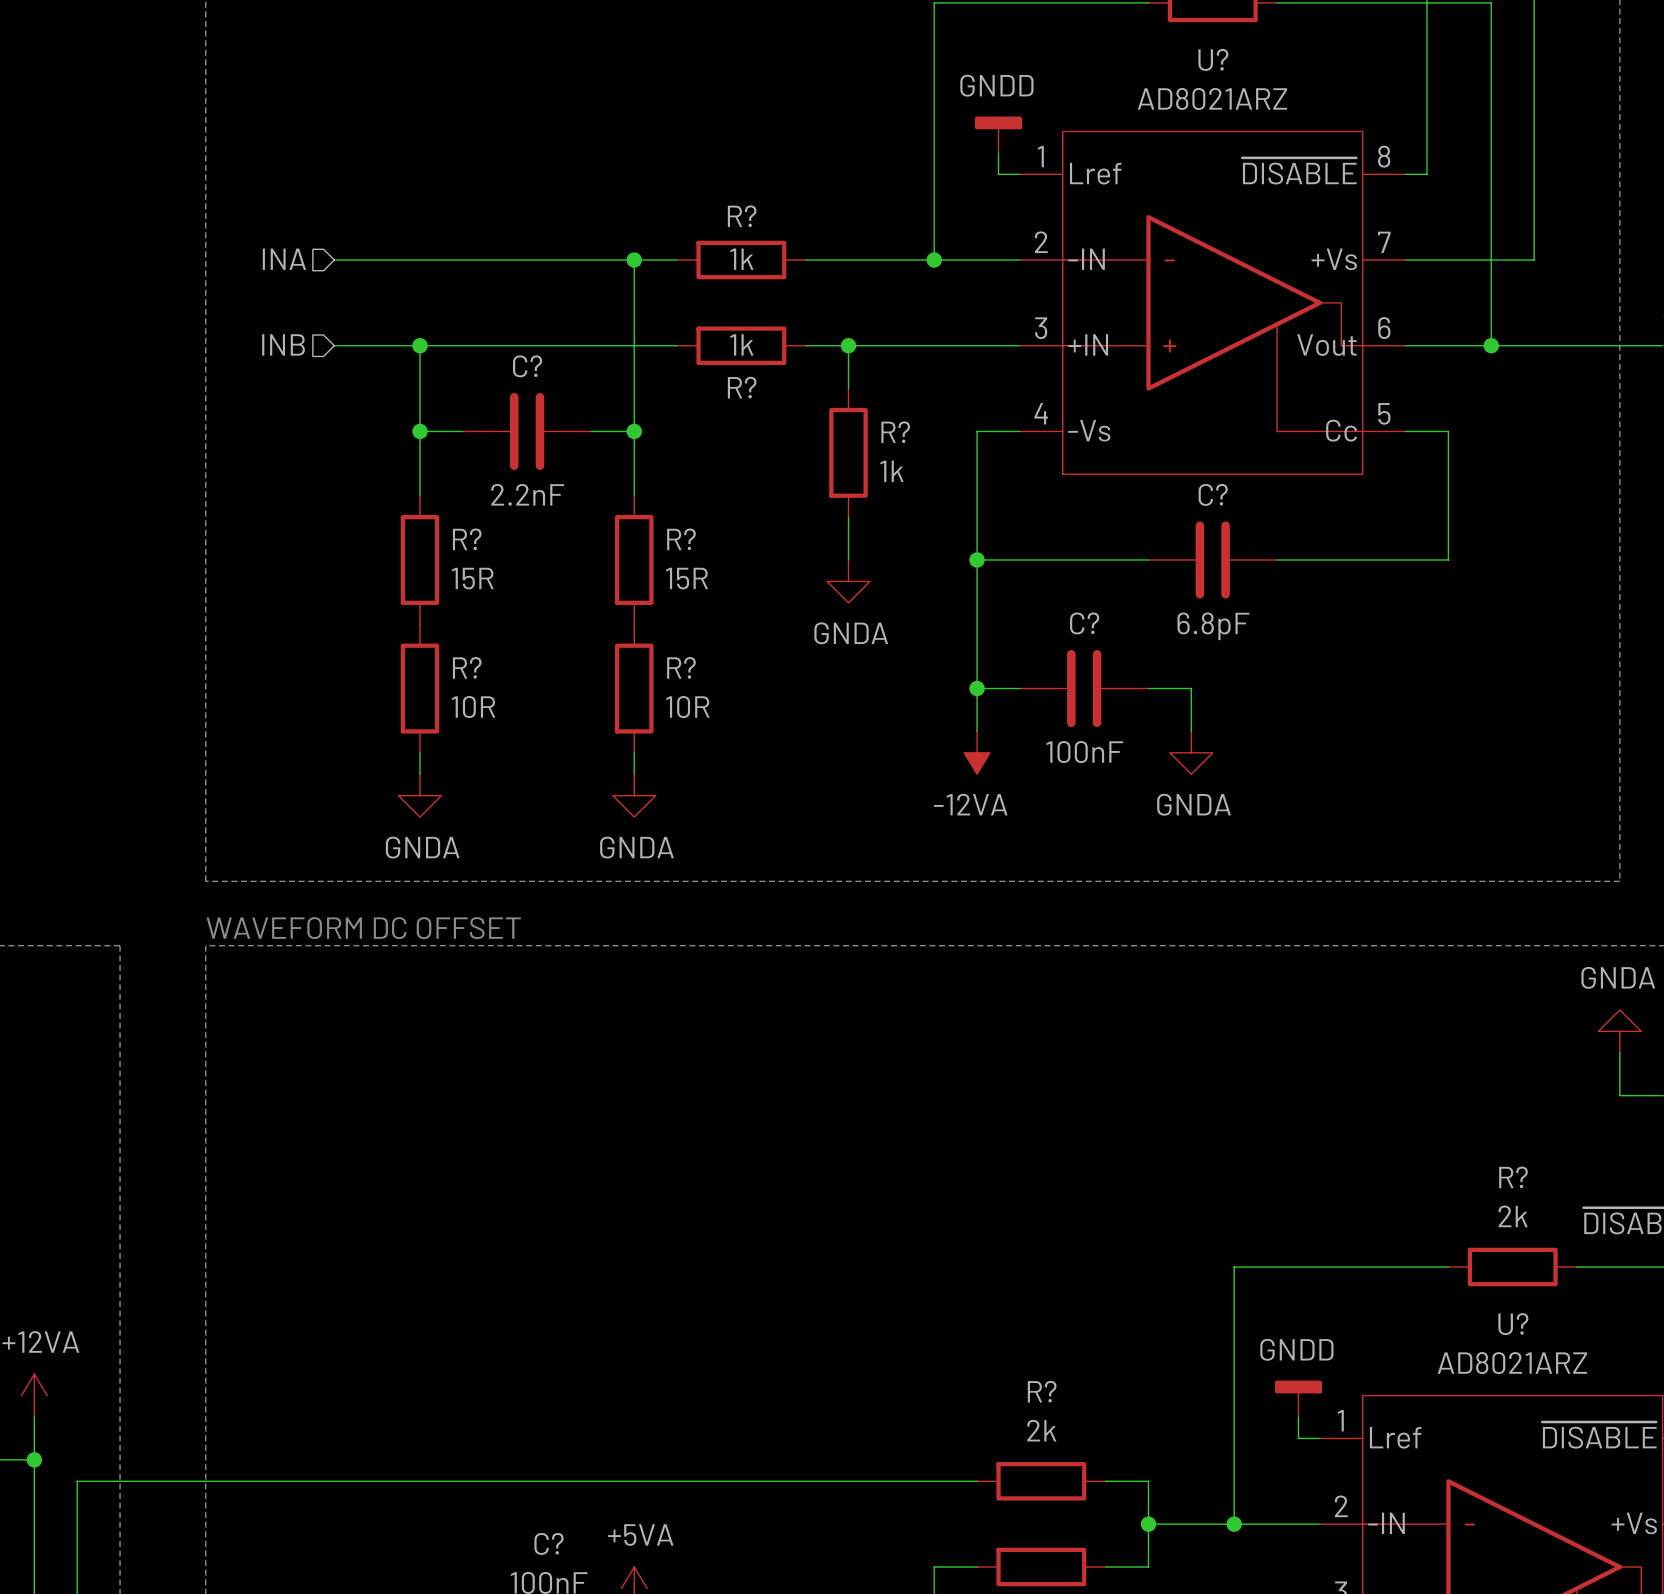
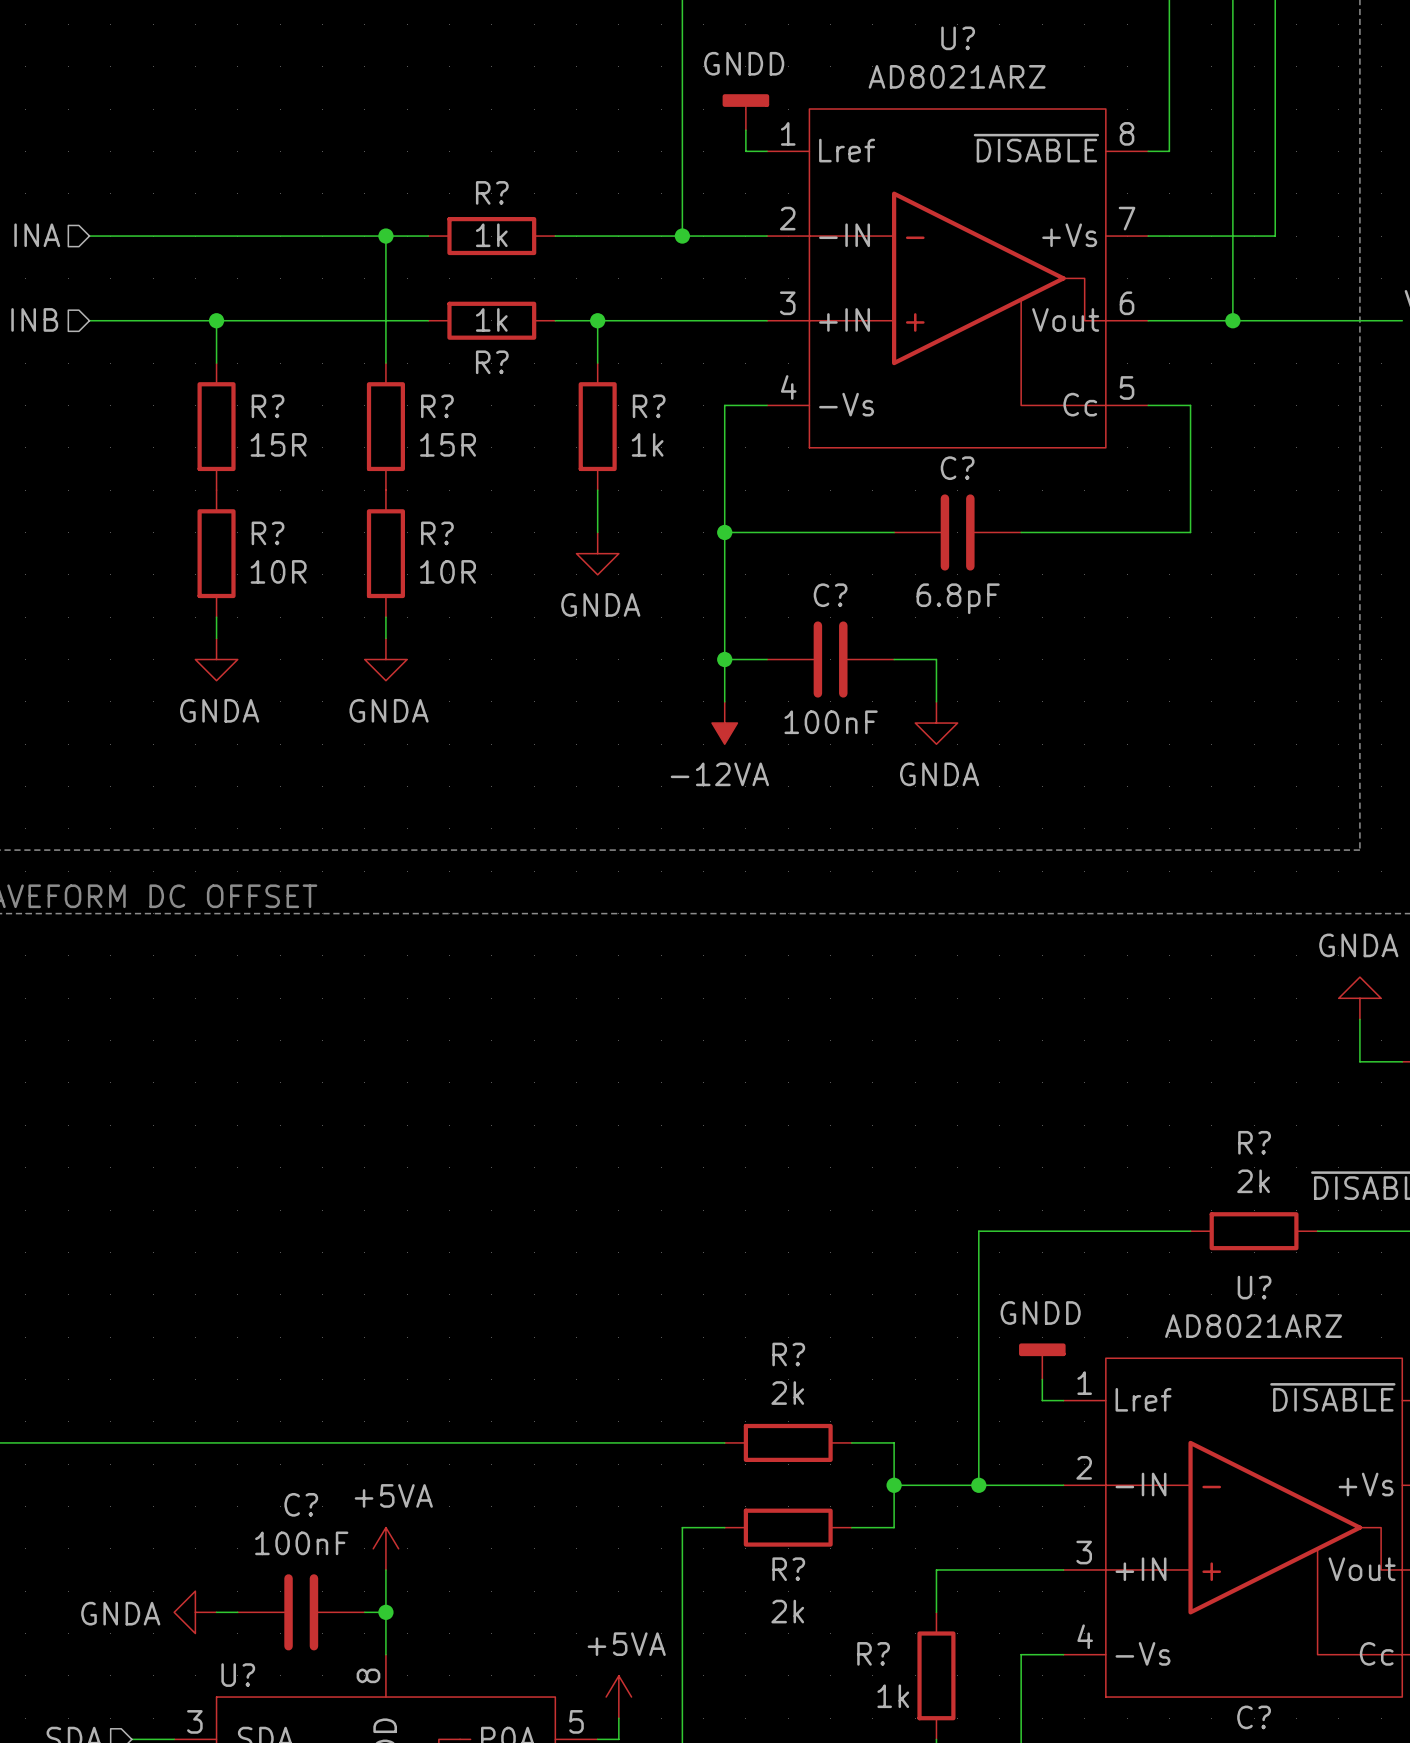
wire: (419, 345) (419, 495) -> none
junction position: (419, 345) -> (216, 320)
wire: none -> (216, 320) (216, 363)
wire: (634, 388) (634, 495) -> none
wire: (419, 431) (462, 431) -> none
junction: (419, 431) -> none
C?: 2.2nF (527, 431) -> none
wire: (591, 431) (634, 431) -> none
junction: (634, 431) -> none
R?: none -> 15R (216, 426)
R?: none -> 15R (385, 426)
R?: 15R (419, 559) -> none
R?: 15R (634, 559) -> none
R?: none -> 10R (216, 553)
R?: none -> 10R (385, 553)
R?: 10R (419, 688) -> none
power symbol: none -> GNDA (216, 659)
R?: 10R (634, 688) -> none
power symbol: none -> GNDA (385, 659)
wire: (419, 752) (419, 774) -> (216, 617) (216, 638)
wire: (634, 752) (634, 774) -> (385, 617) (385, 638)
power symbol: GNDA (419, 795) -> none
power symbol: GNDA (634, 795) -> none

